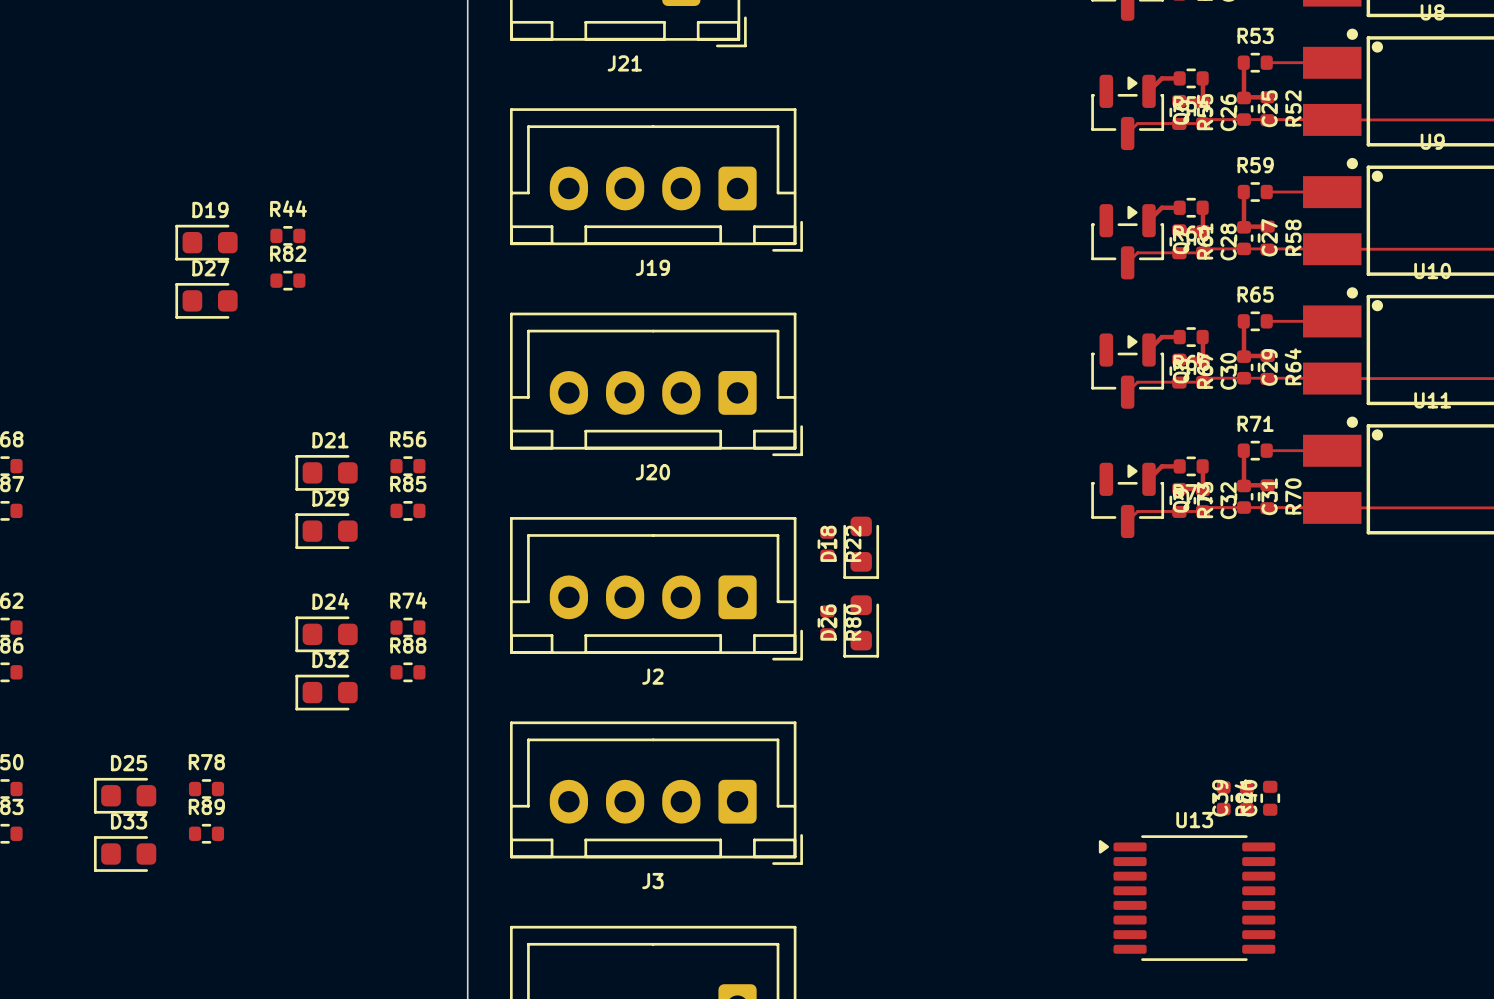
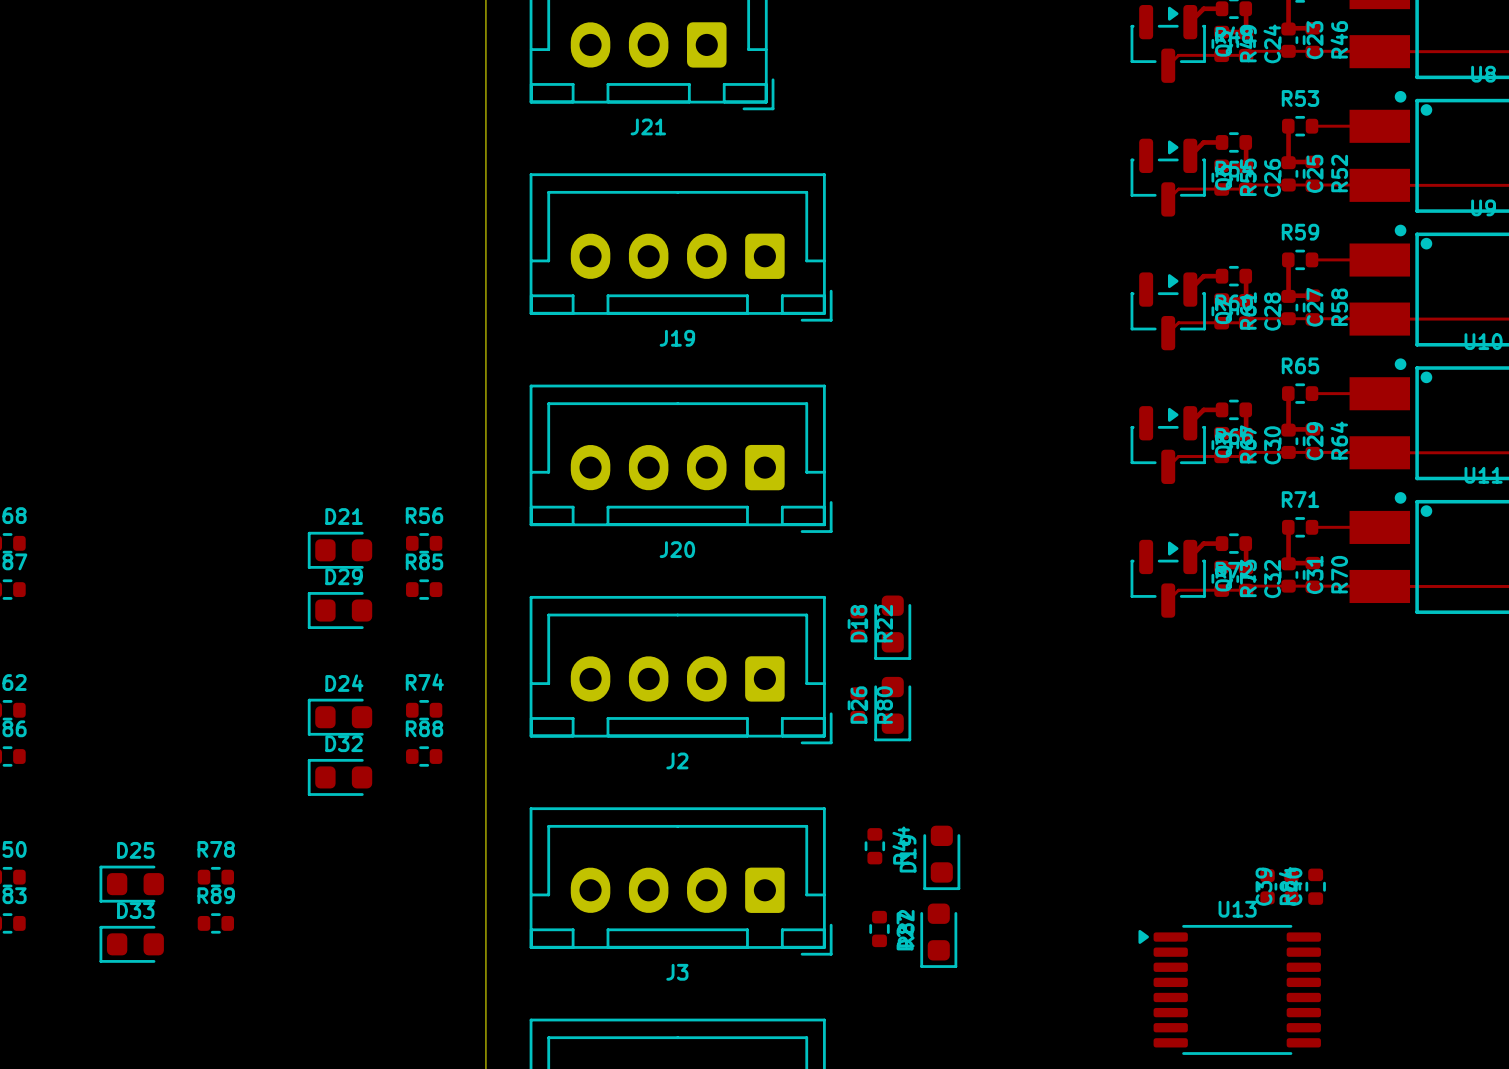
R44 rotation: 0° (287, 235) -> 90° clockwise (874, 846)
R44 position: (287, 235) -> (874, 846)
D19 rotation: 0° (206, 242) -> 90° counterclockwise (941, 857)
D19 position: (206, 242) -> (941, 857)
R82 rotation: 0° (287, 280) -> 90° clockwise (879, 929)
R82 position: (287, 280) -> (879, 929)
D27 rotation: 0° (206, 300) -> 90° counterclockwise (938, 935)
D27 position: (206, 300) -> (938, 935)

